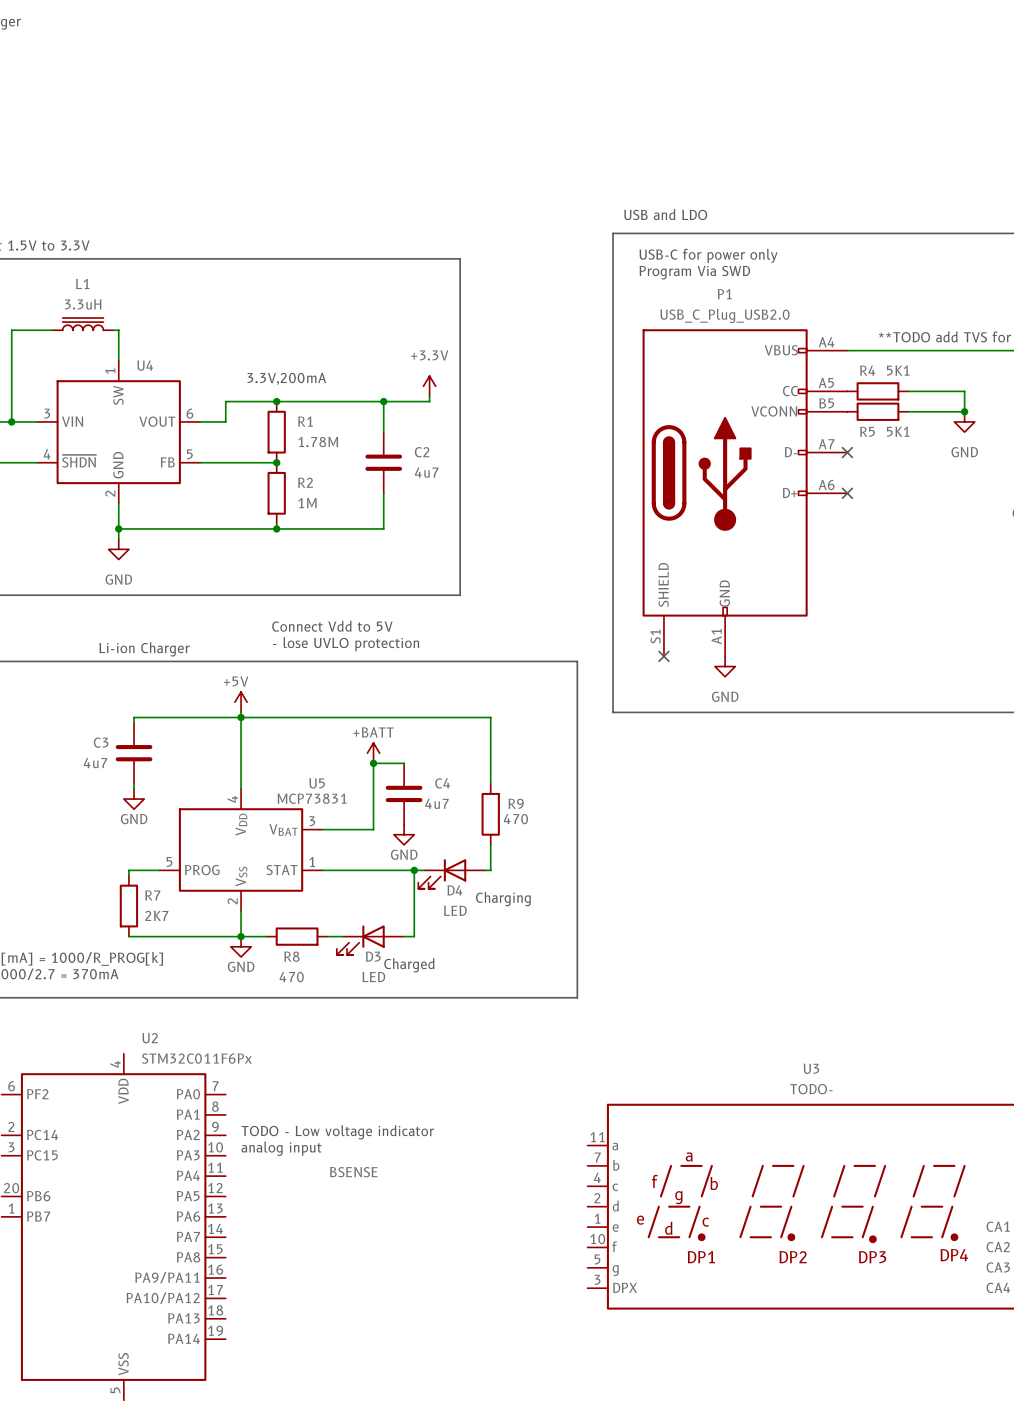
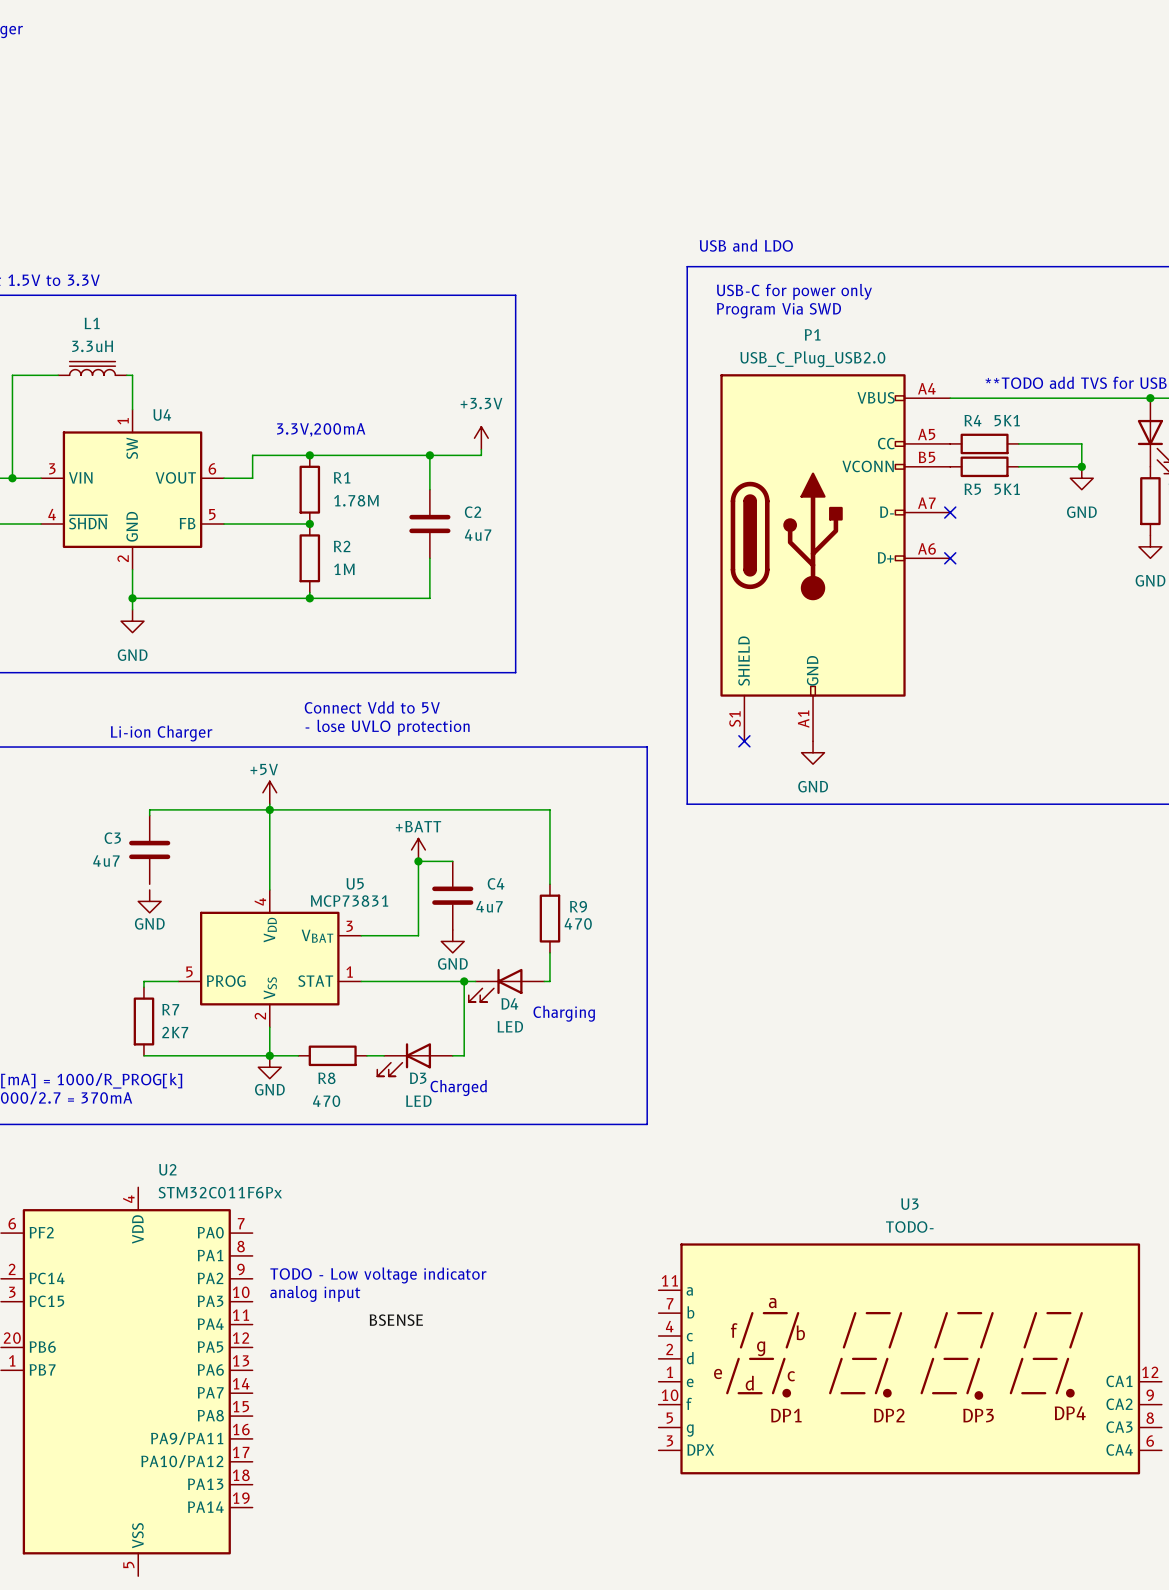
wire: (134, 783) (134, 788) -> none

